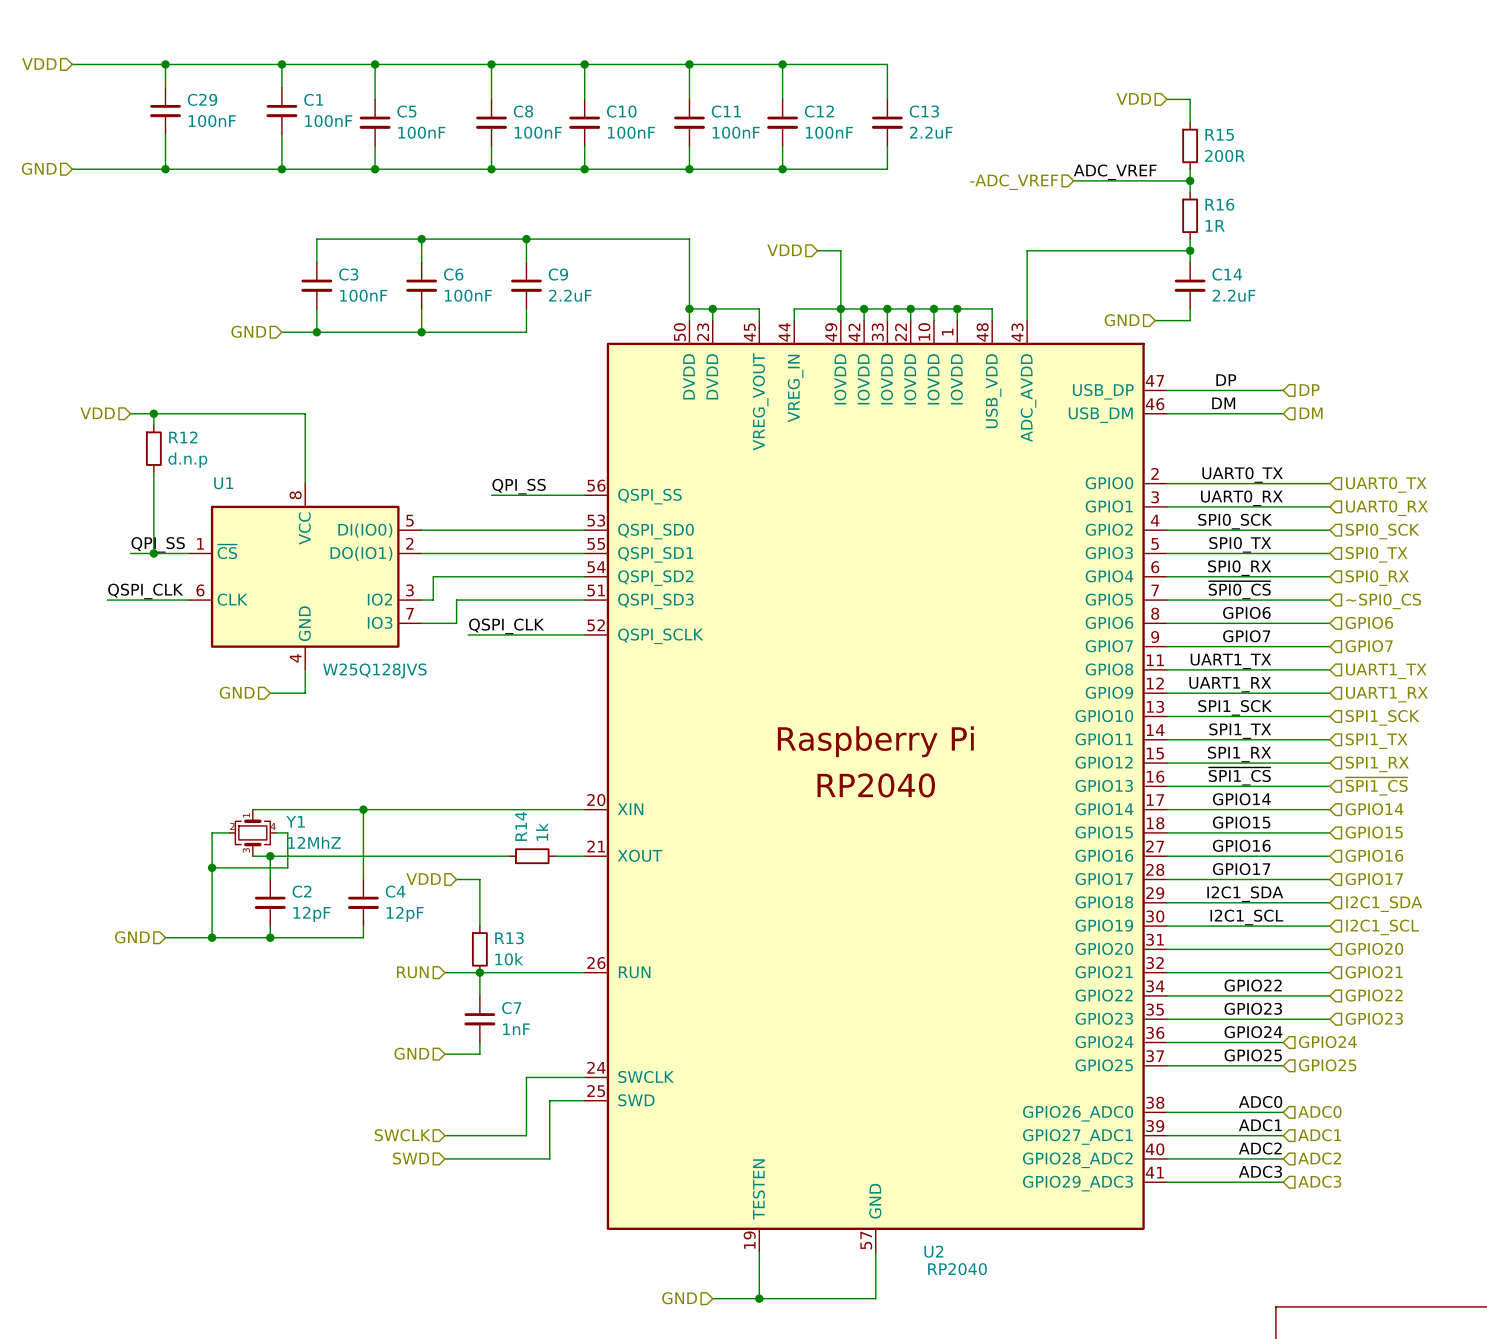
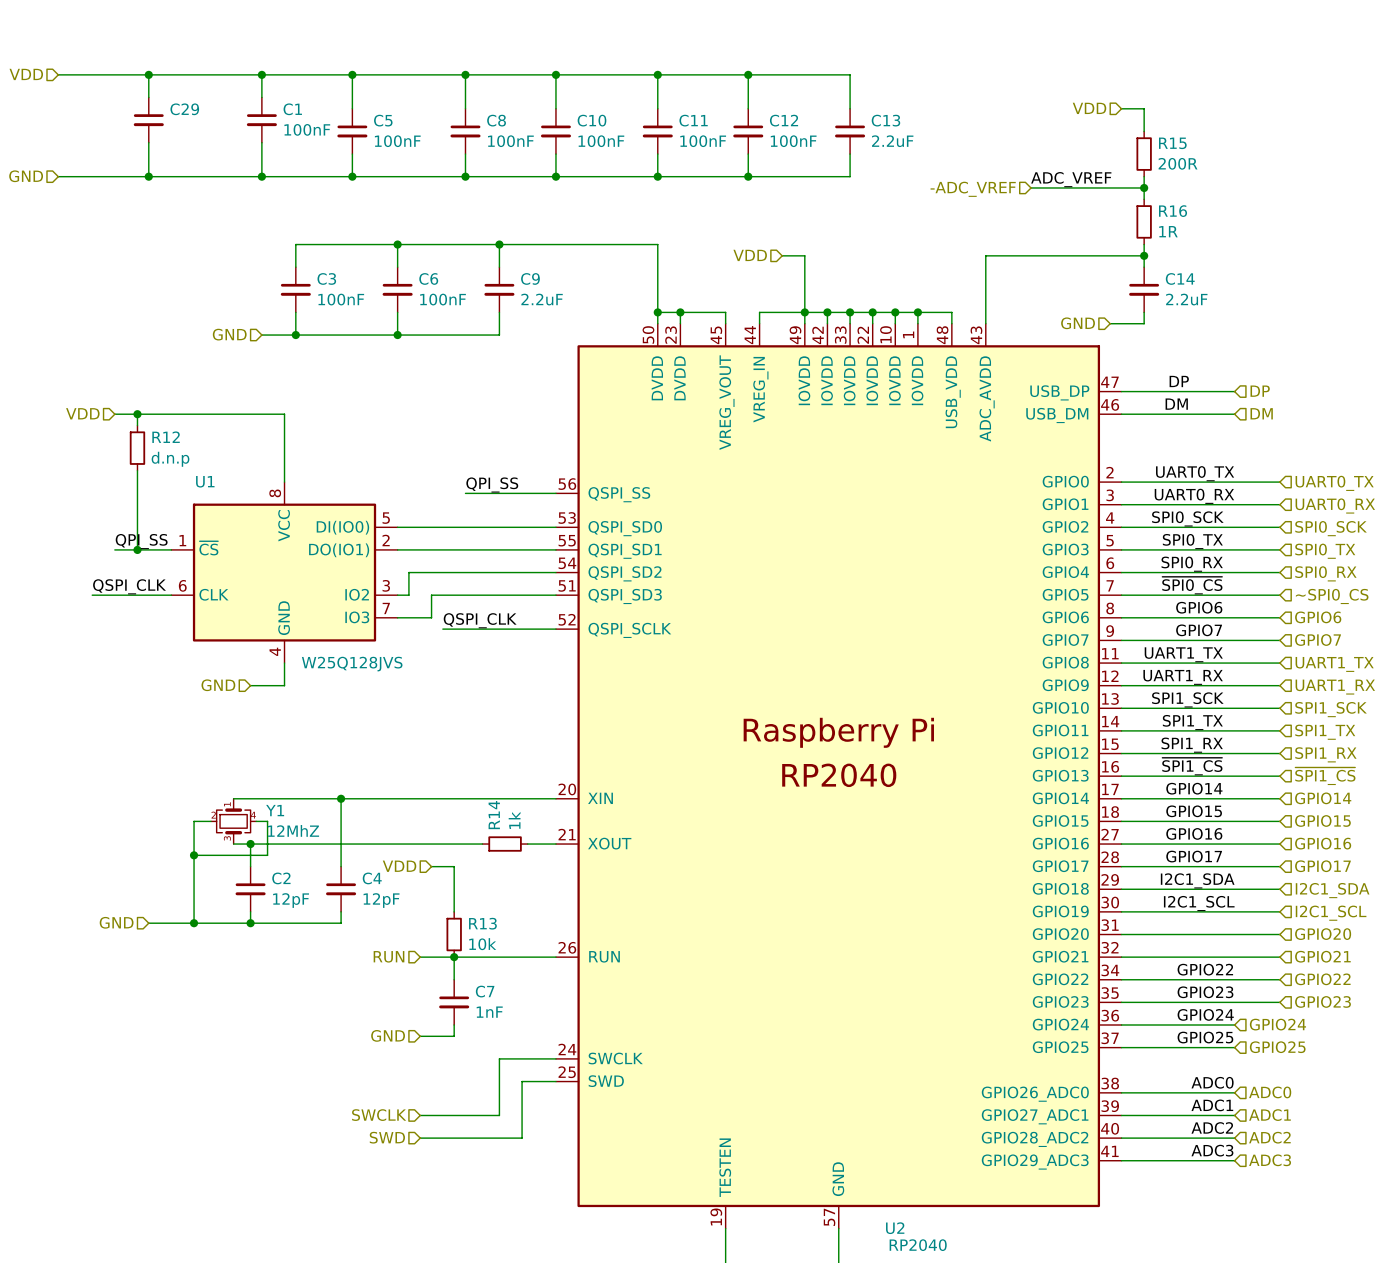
C29 value: 100nF (212, 121) -> none

